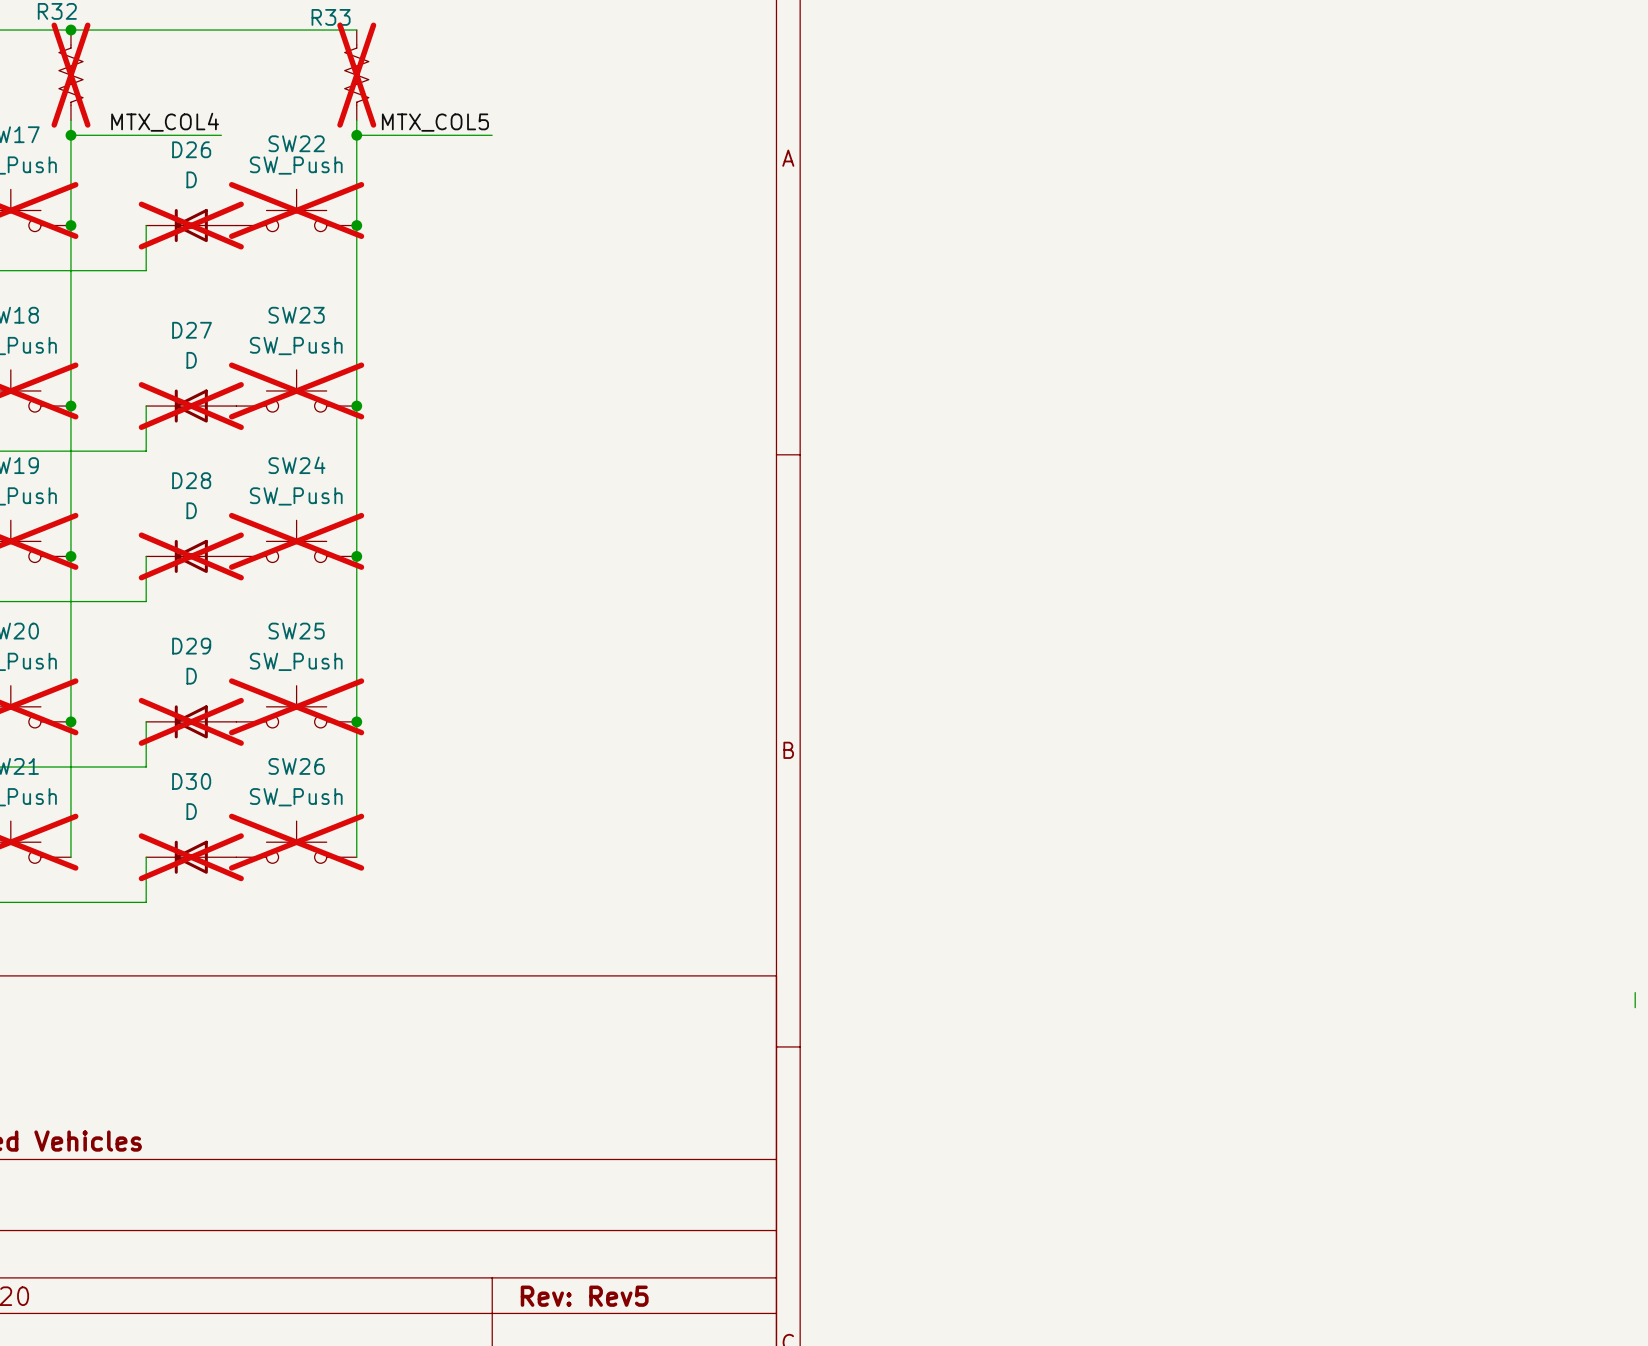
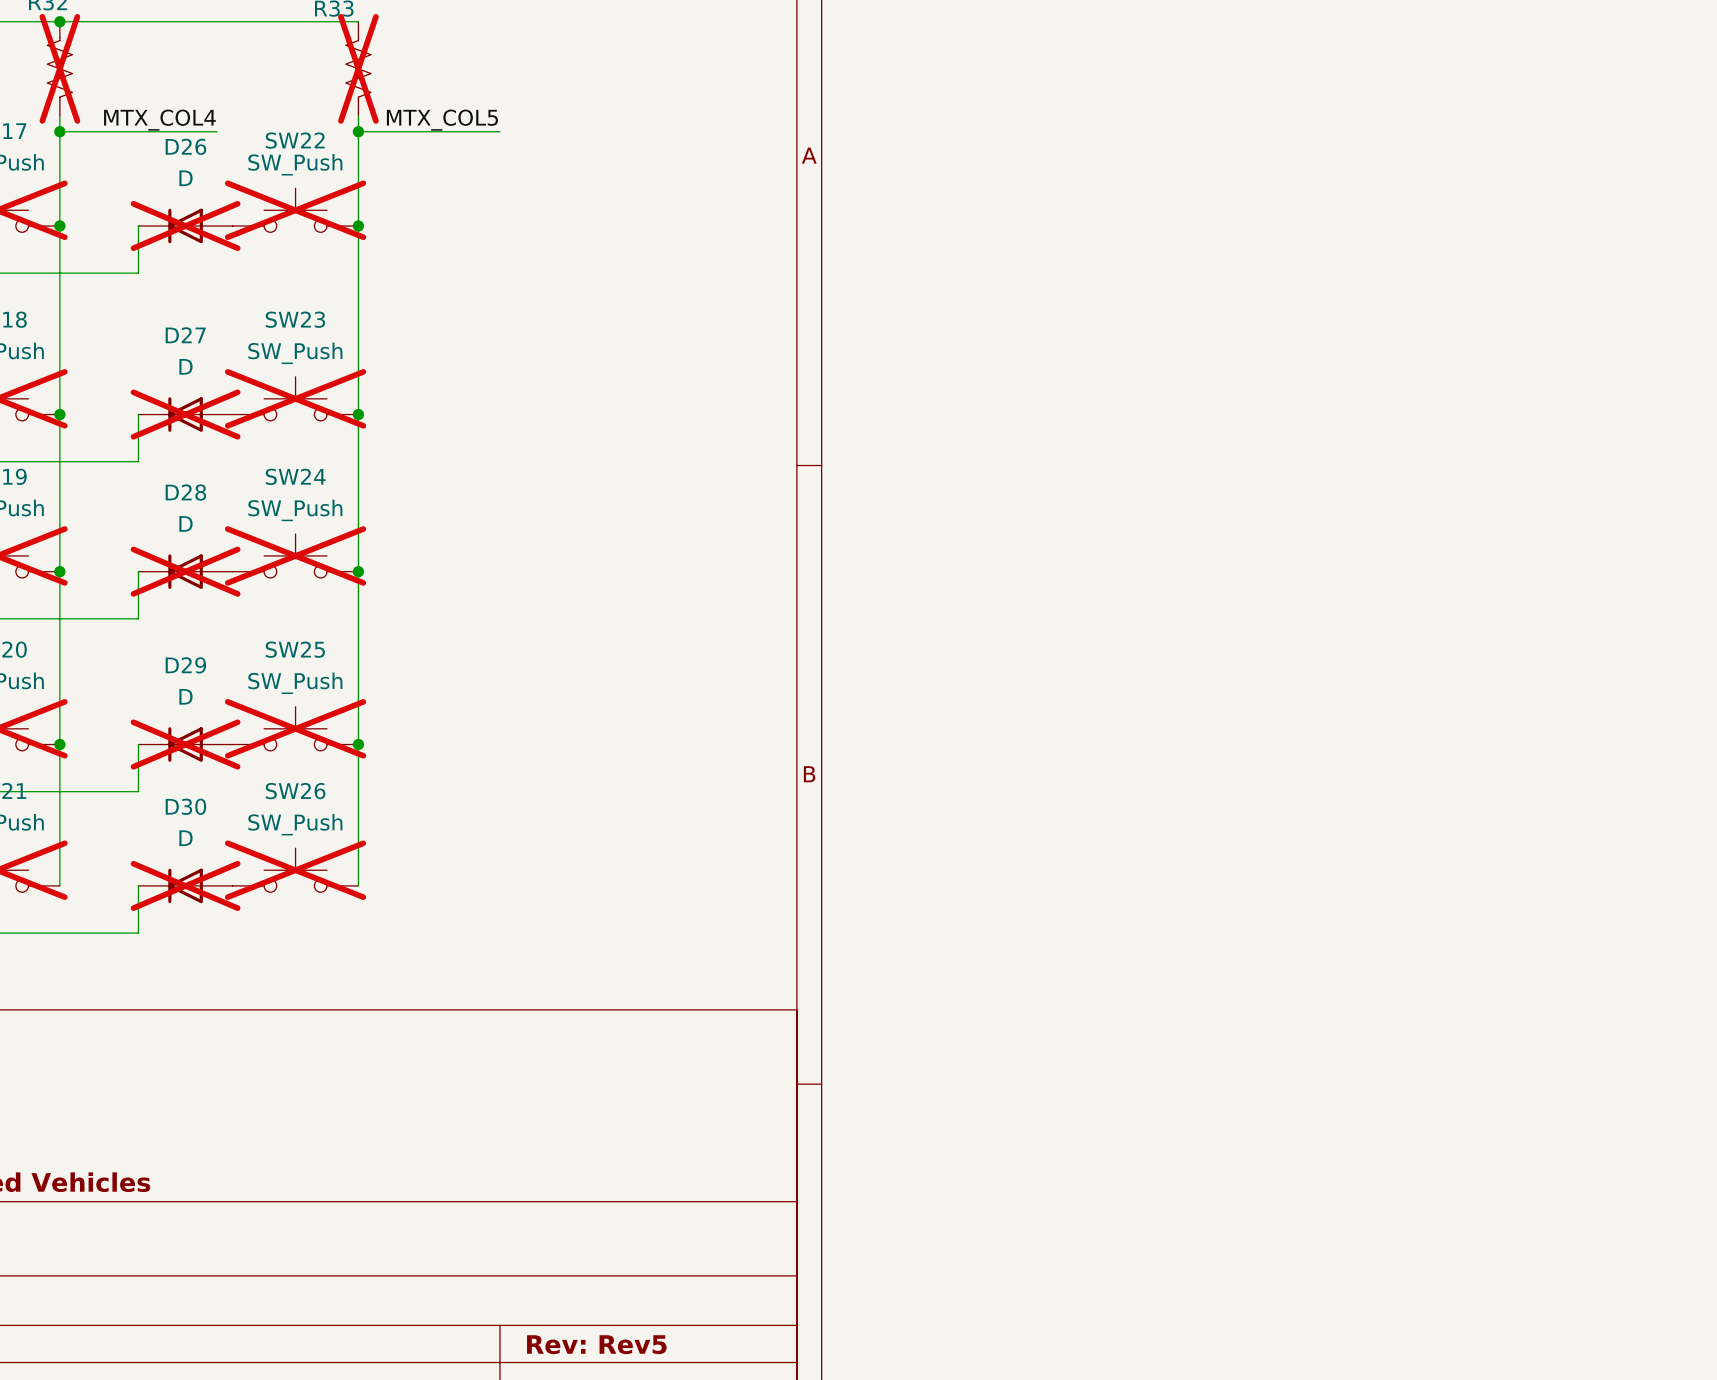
wire: (1635, 992) (1635, 1007) -> none

